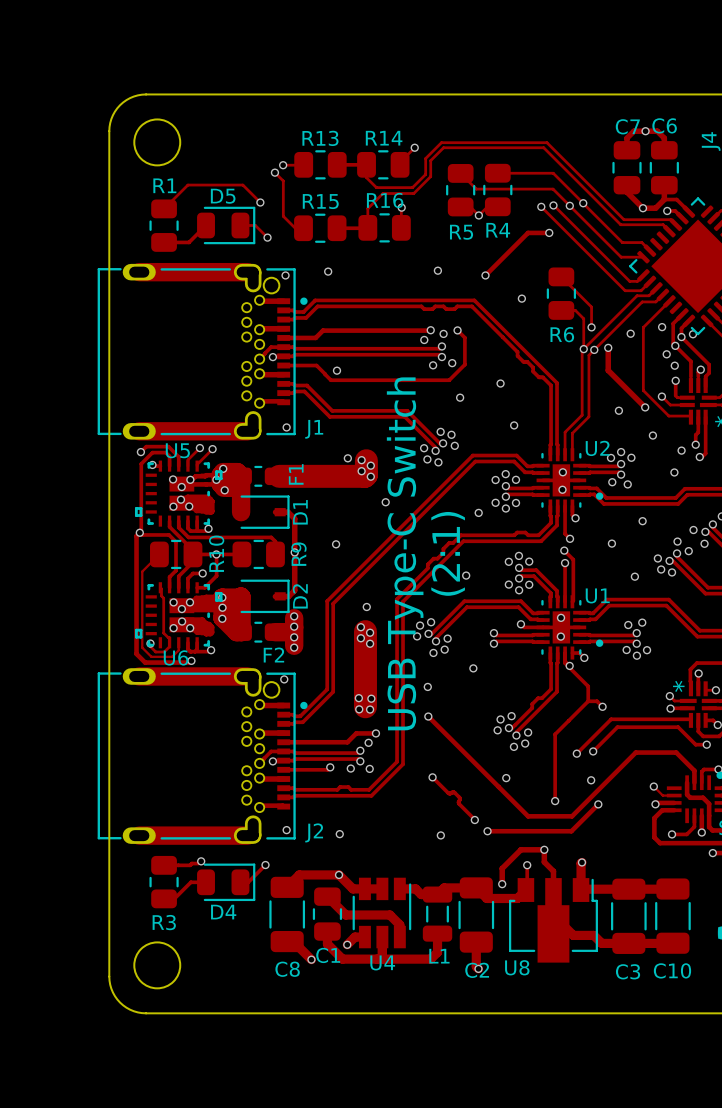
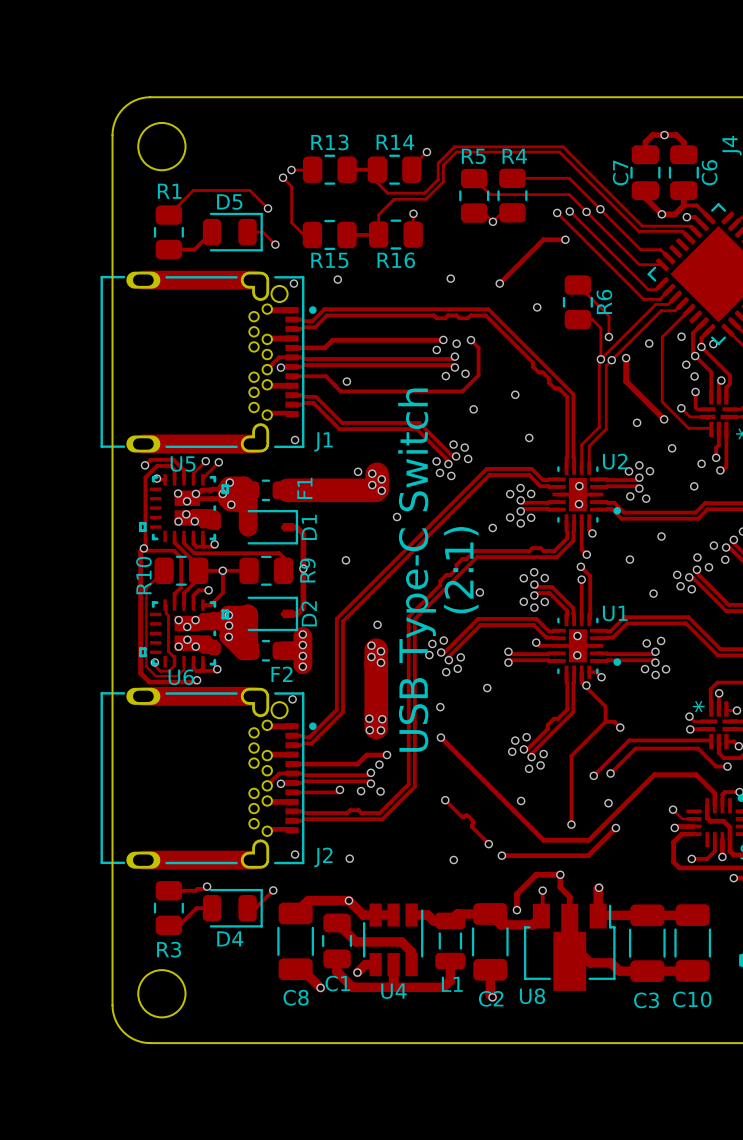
C6 name rotation: 0° (664, 125) -> 90° counterclockwise (709, 172)
C6 name position: C6 (664, 125) -> C6 (709, 172)
C7 name rotation: 0° (627, 126) -> 90° counterclockwise (620, 172)
C7 name position: C7 (627, 126) -> C7 (620, 172)
R16 name position: R16 (385, 200) -> R16 (396, 260)
R15 name position: R15 (320, 201) -> R15 (329, 260)
R4 name position: R4 (498, 230) -> R4 (514, 156)
R5 name position: R5 (461, 232) -> R5 (473, 156)
R6 name rotation: 0° (562, 334) -> 90° counterclockwise (604, 301)
R6 name position: R6 (562, 334) -> R6 (604, 301)
R10 name position: R10 (216, 553) -> R10 (143, 575)

